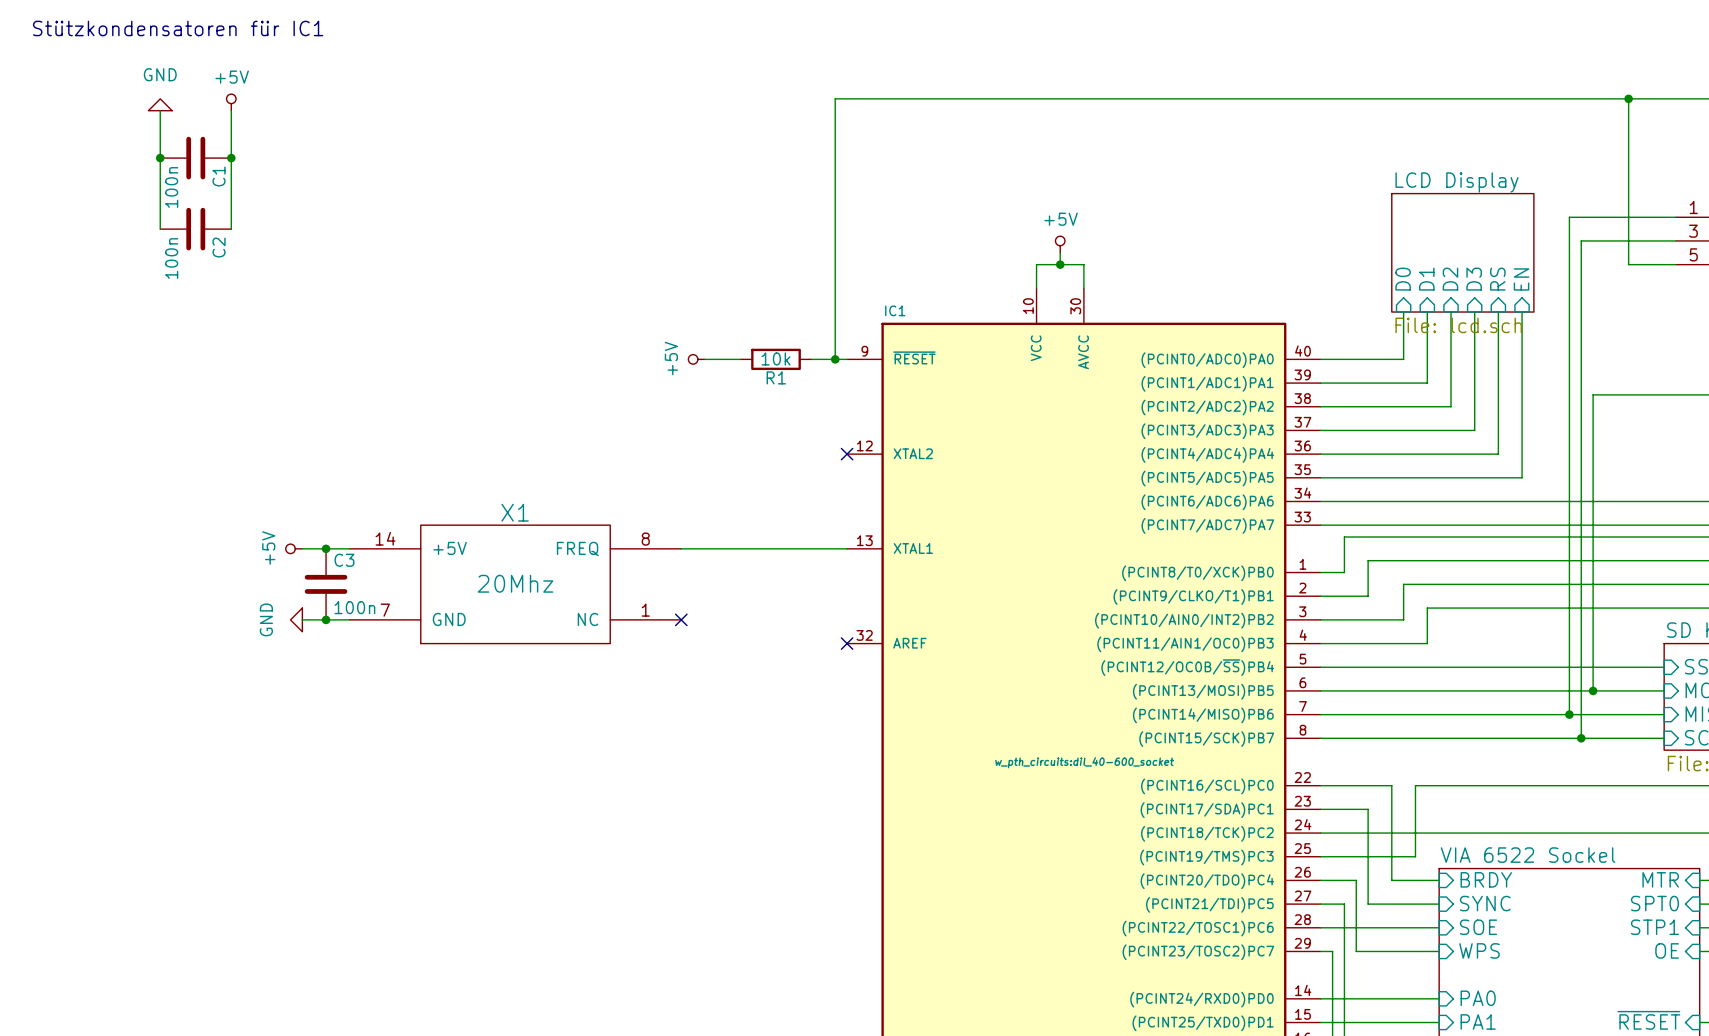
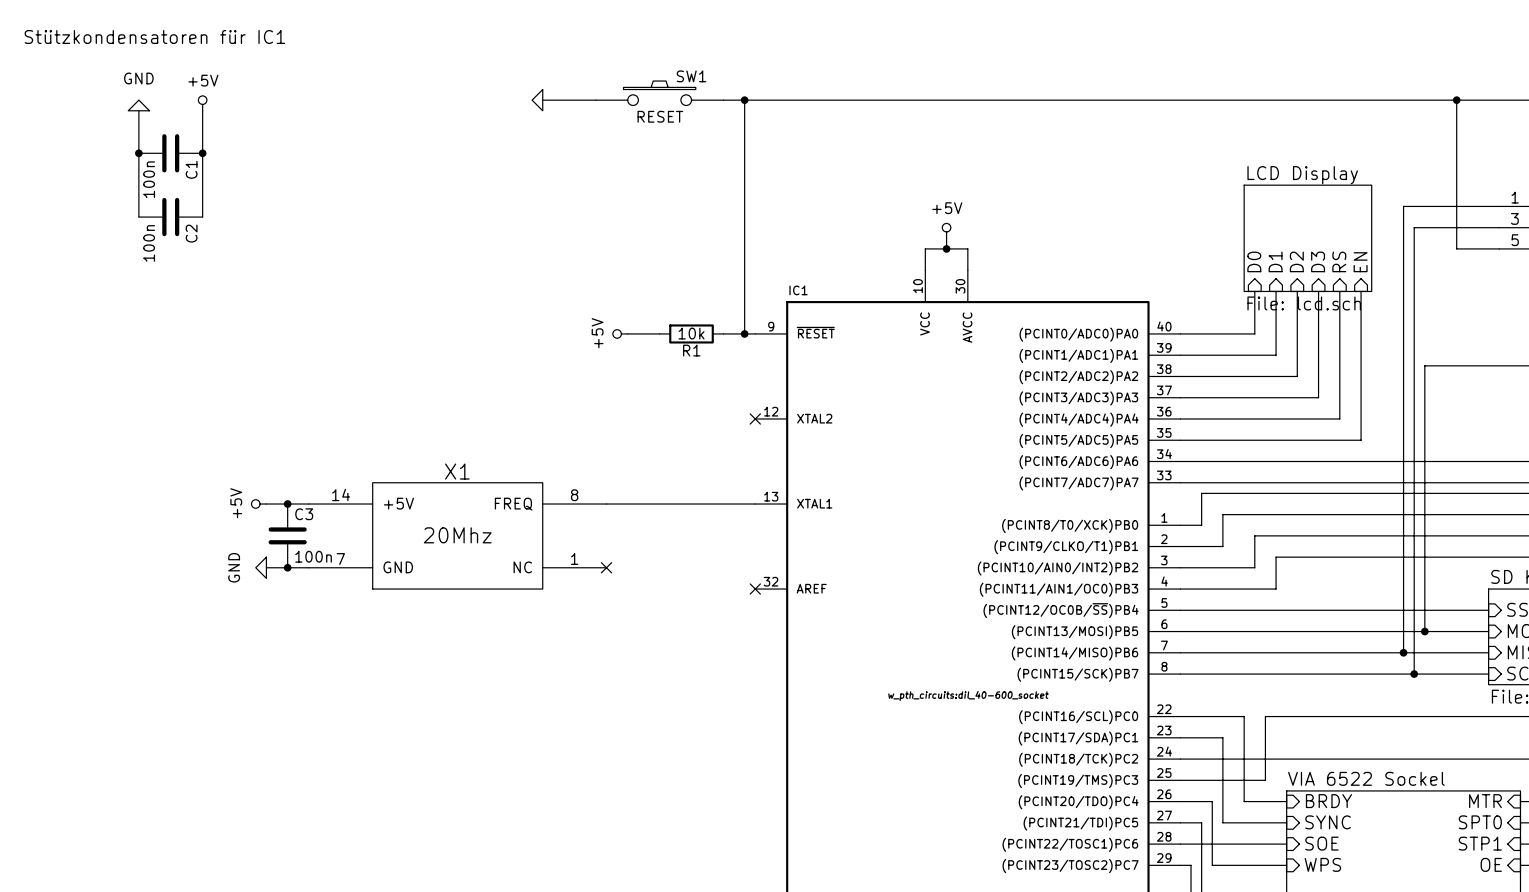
SW1: none -> RESET (659, 93)
power symbol: none -> (537, 100)
wire: none -> (542, 100) (595, 100)
wire: none -> (723, 100) (744, 100)
junction: none -> (744, 100)

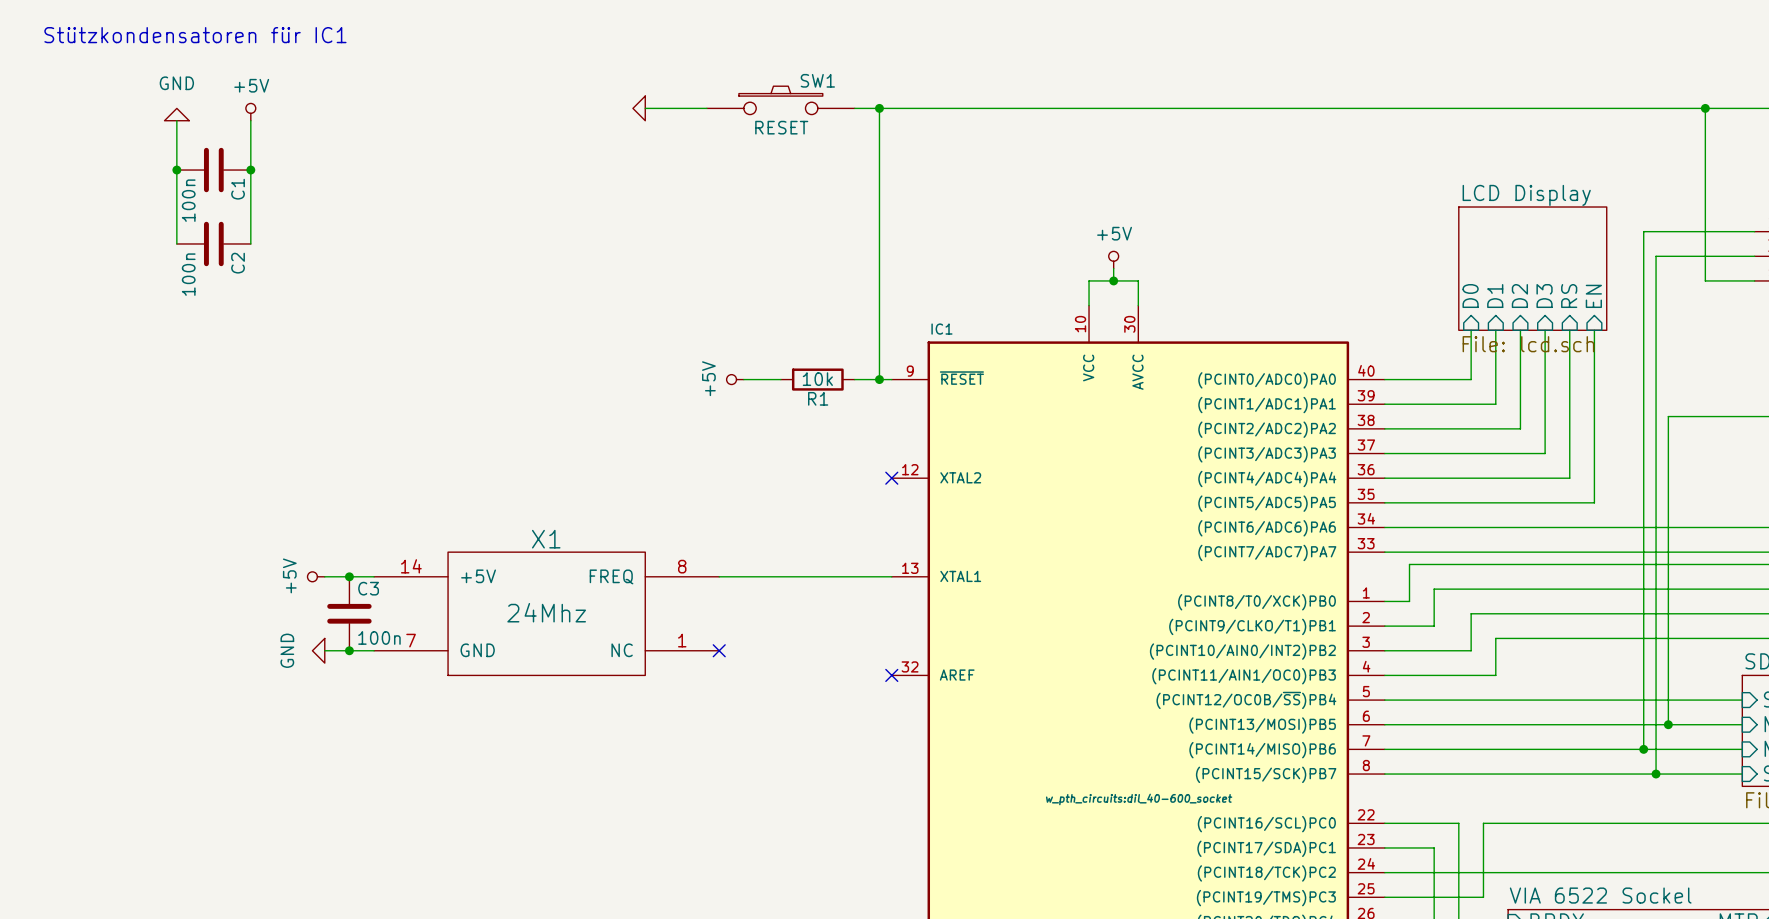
X1 value: 20Mhz (457, 535) -> 24Mhz (546, 612)

